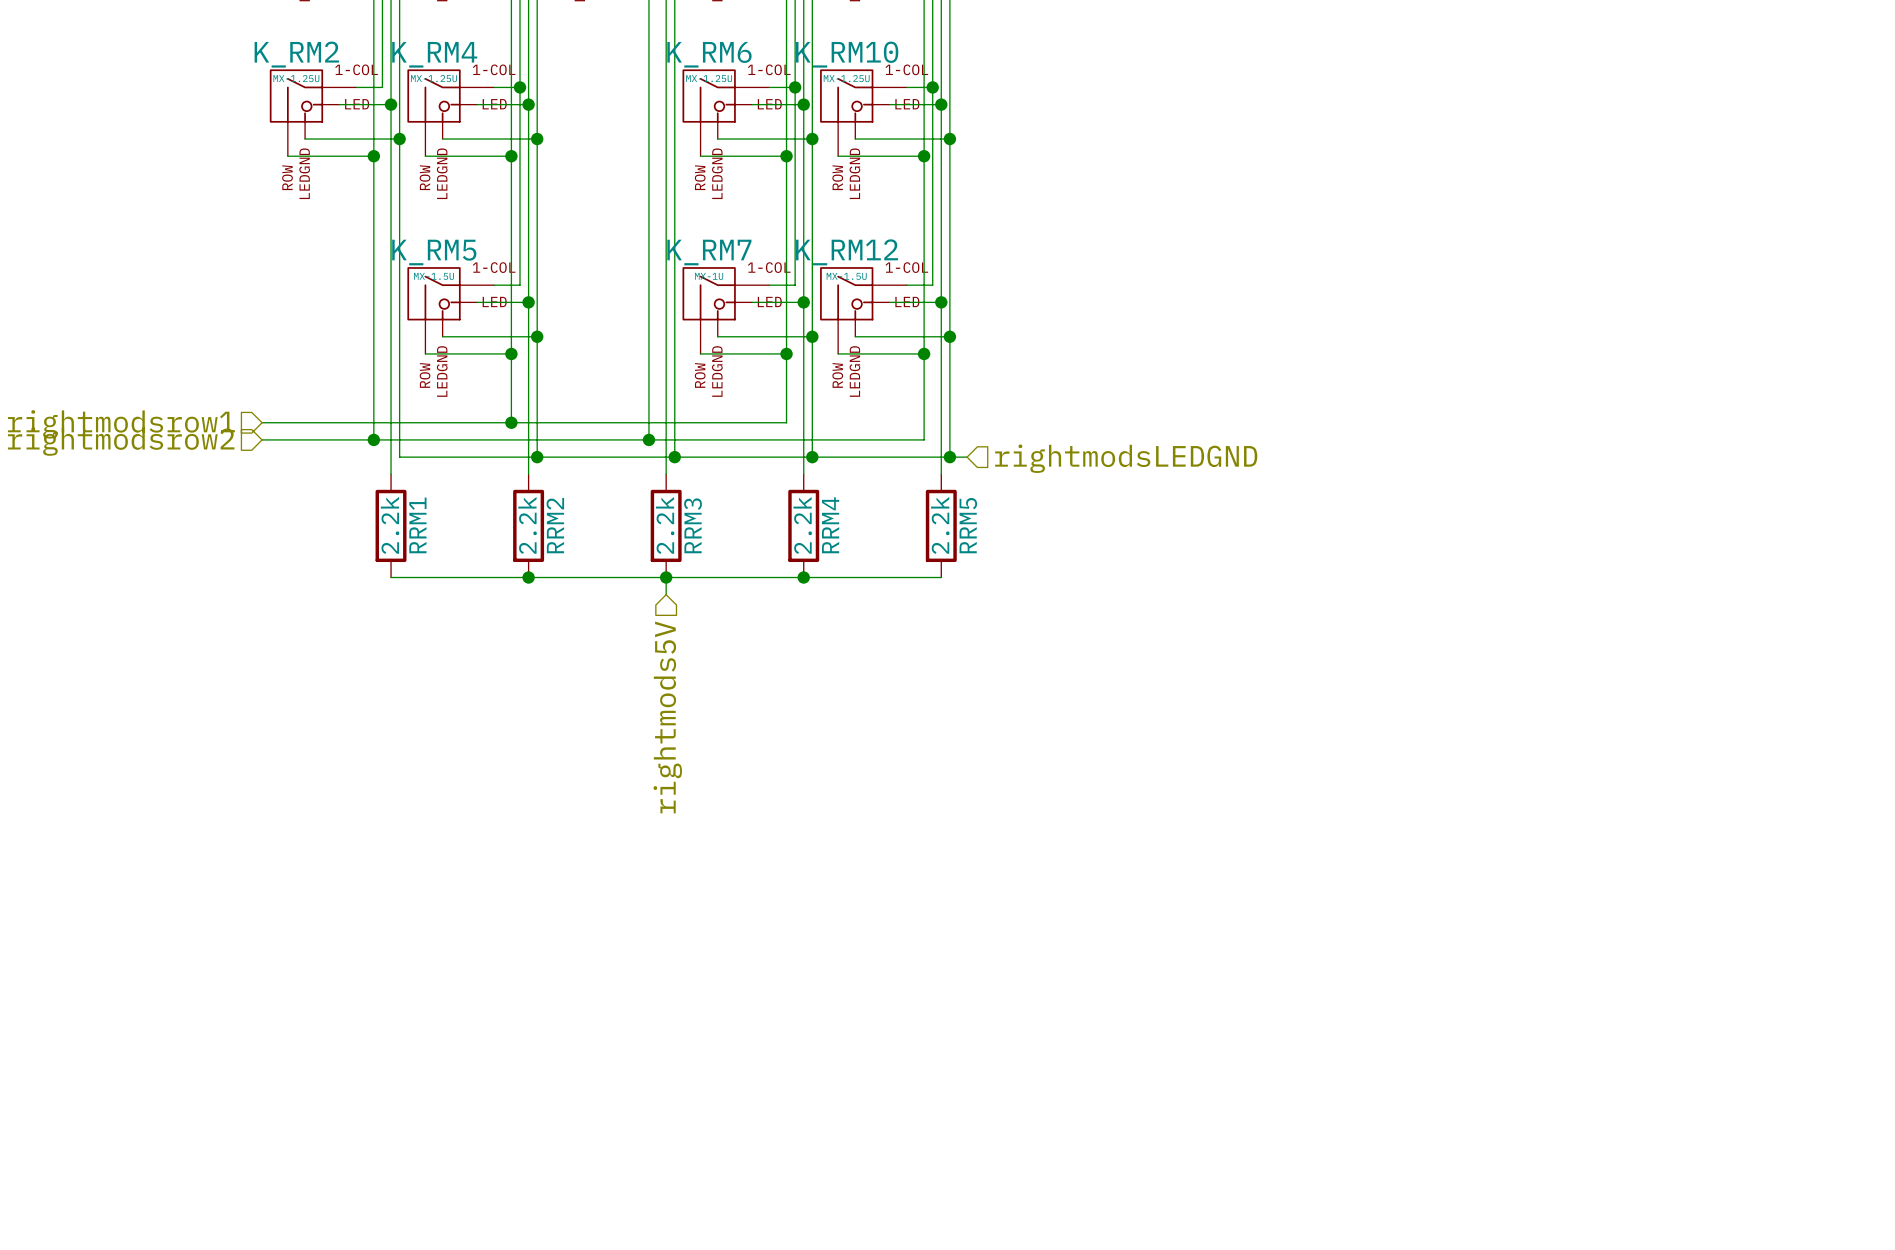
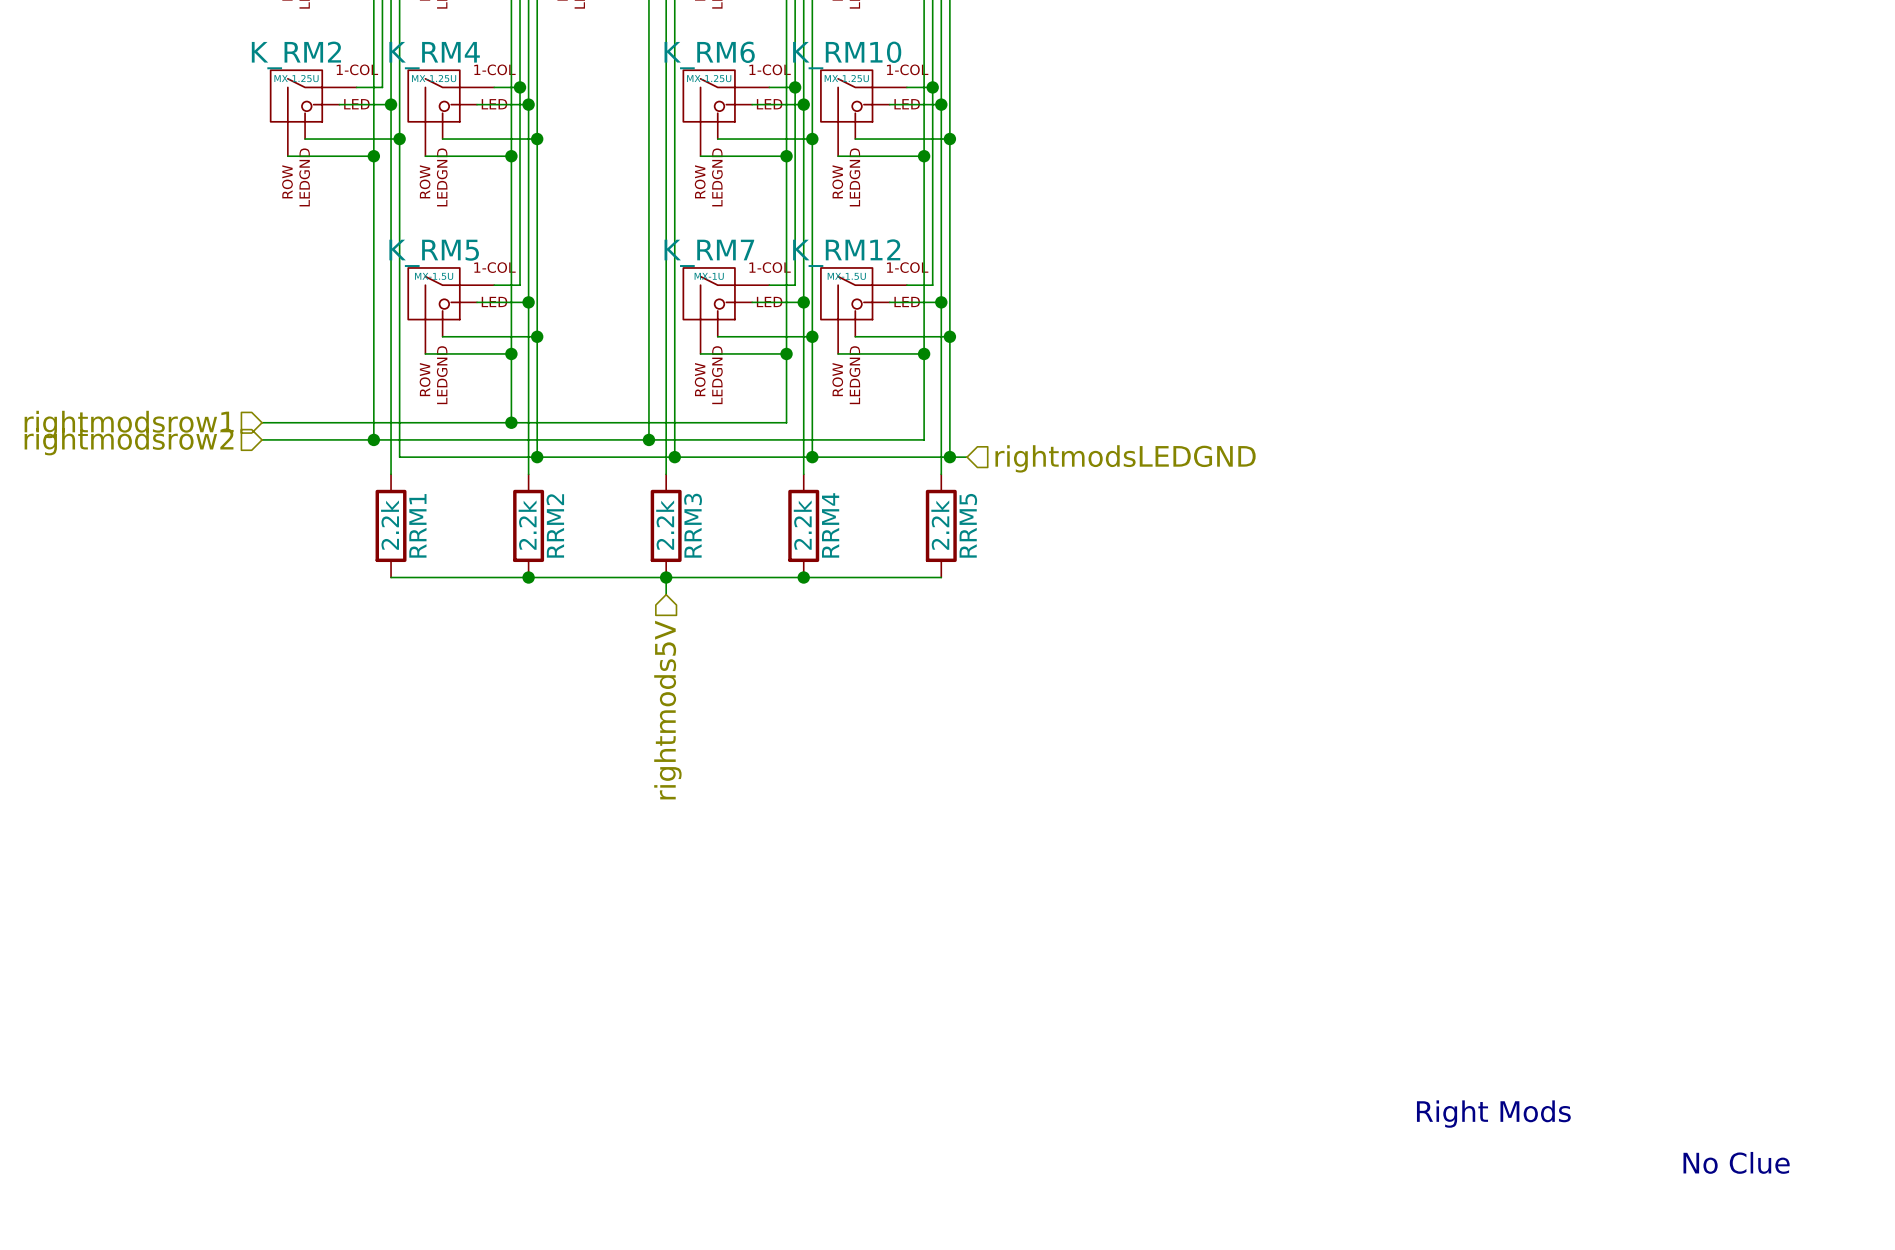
text: none -> Right Mods (1493, 1114)
text: none -> No Clue (1736, 1162)

